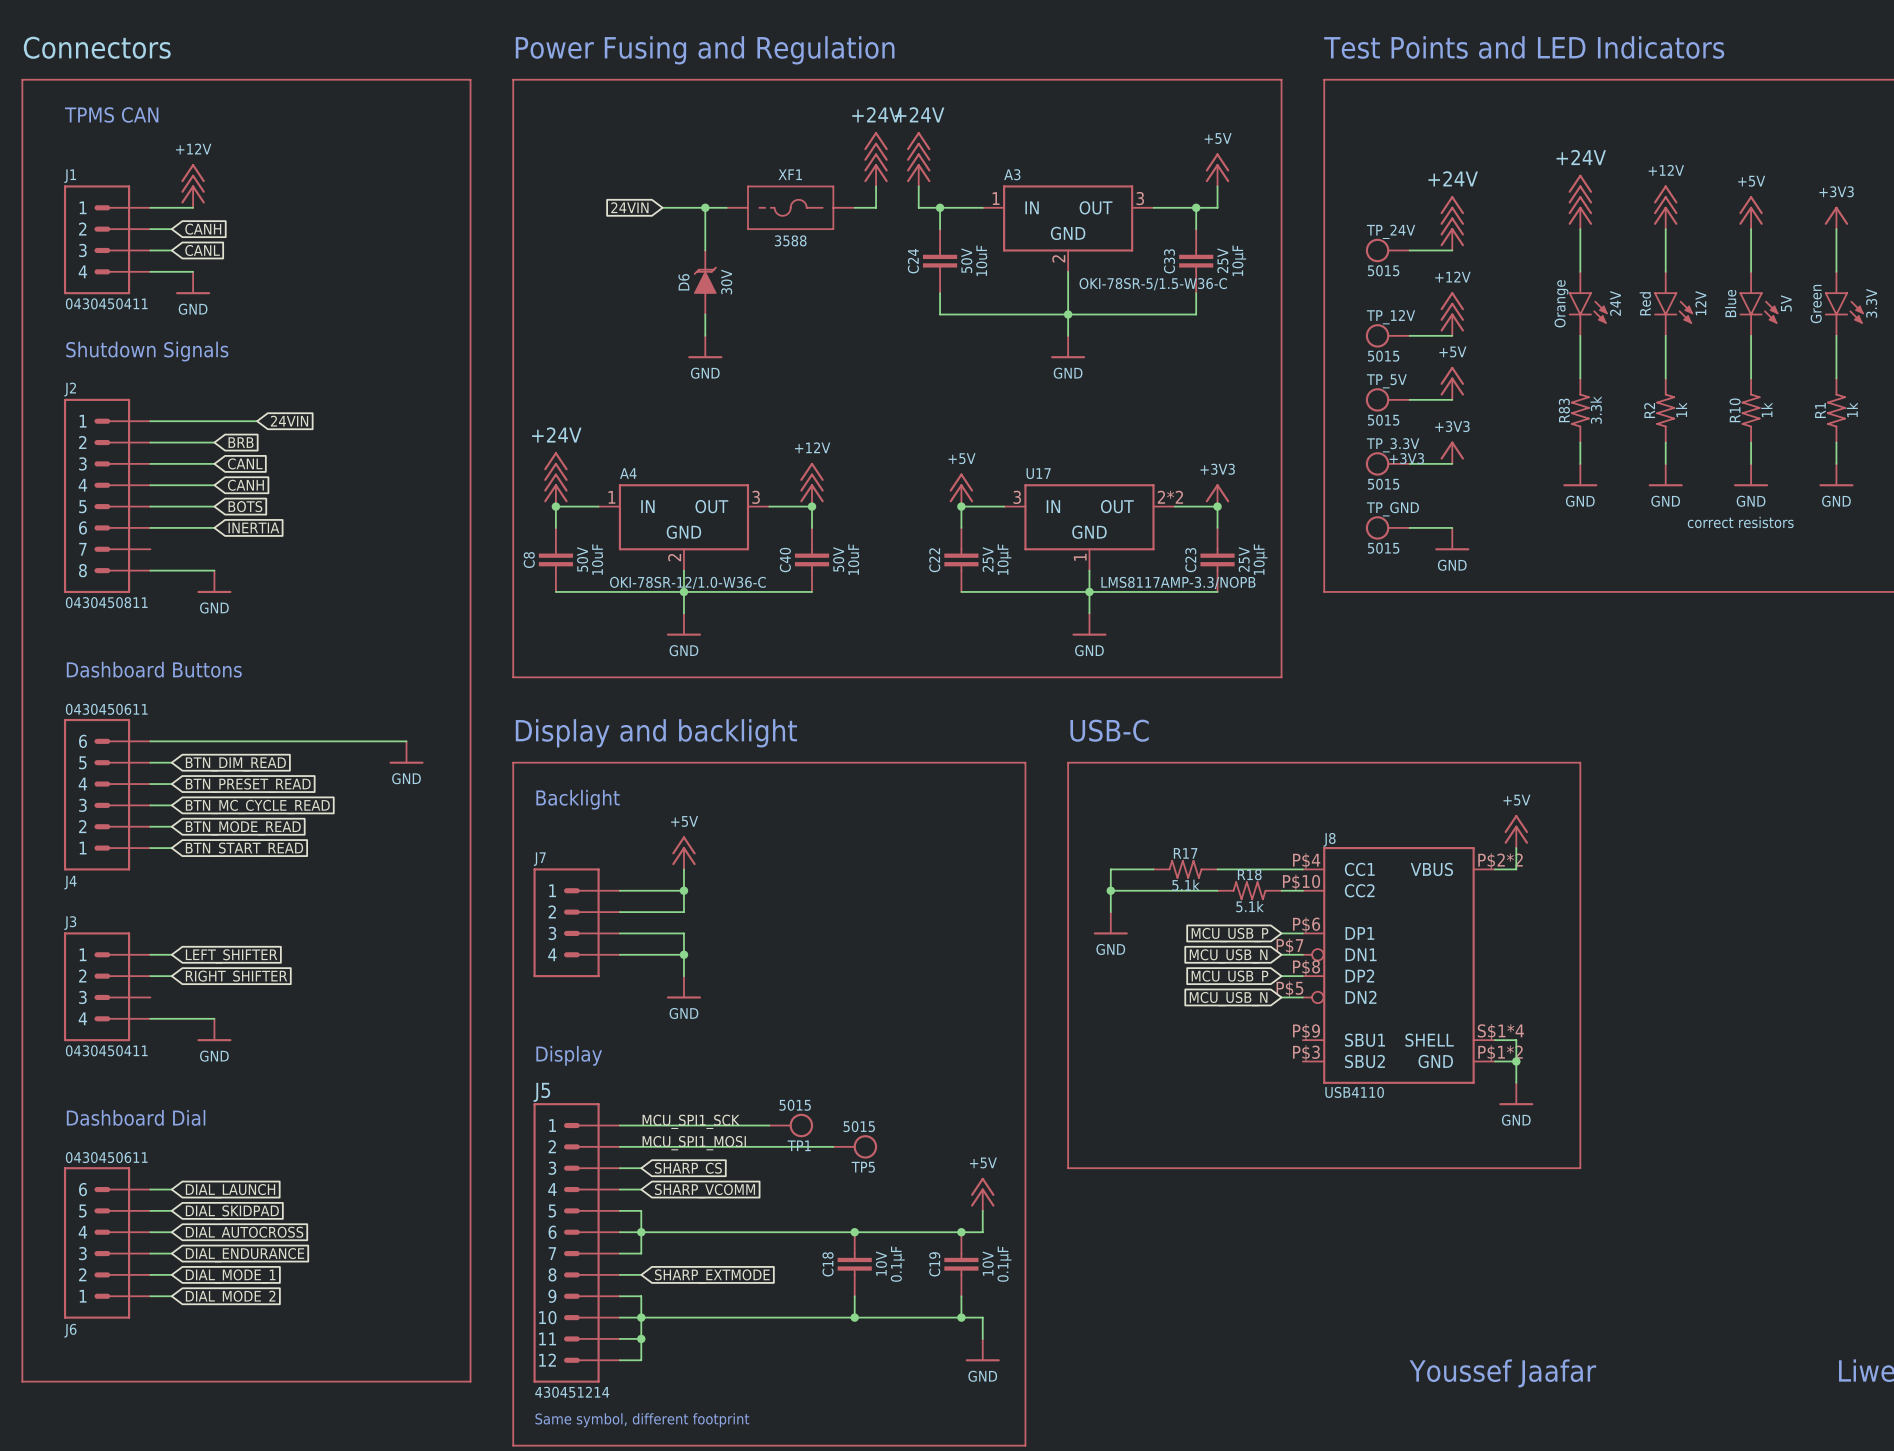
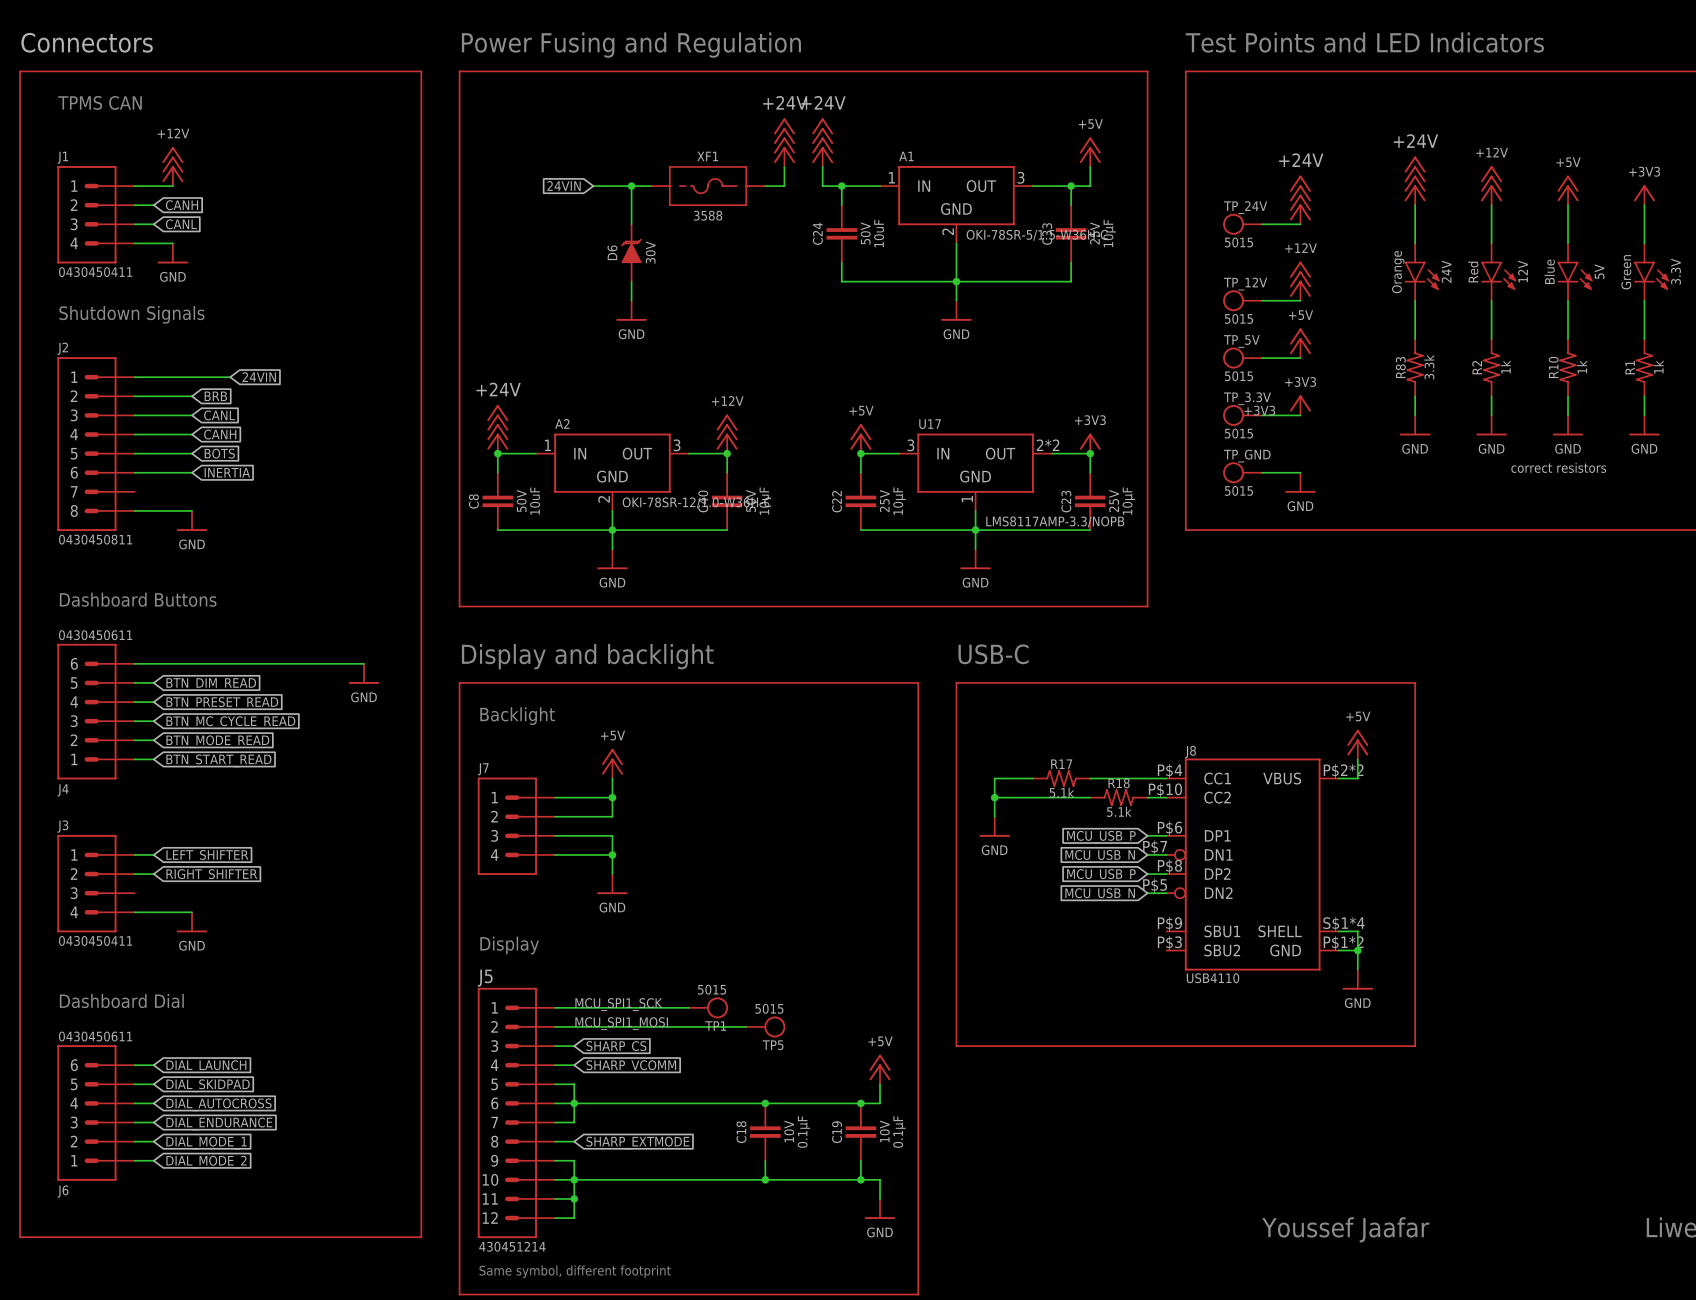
A3 name: A3 (1012, 174) -> A1 (906, 156)
A3 text: OKI-78SR-5/1.5-W36-C (1153, 284) -> OKI-78SR-5/1.5-W36H-C (1037, 235)
A4 name: A4 (628, 473) -> A2 (562, 423)
A4 text: OKI-78SR-12/1.0-W36-C (687, 582) -> OKI-78SR-12/1.0-W36H-C (696, 502)

